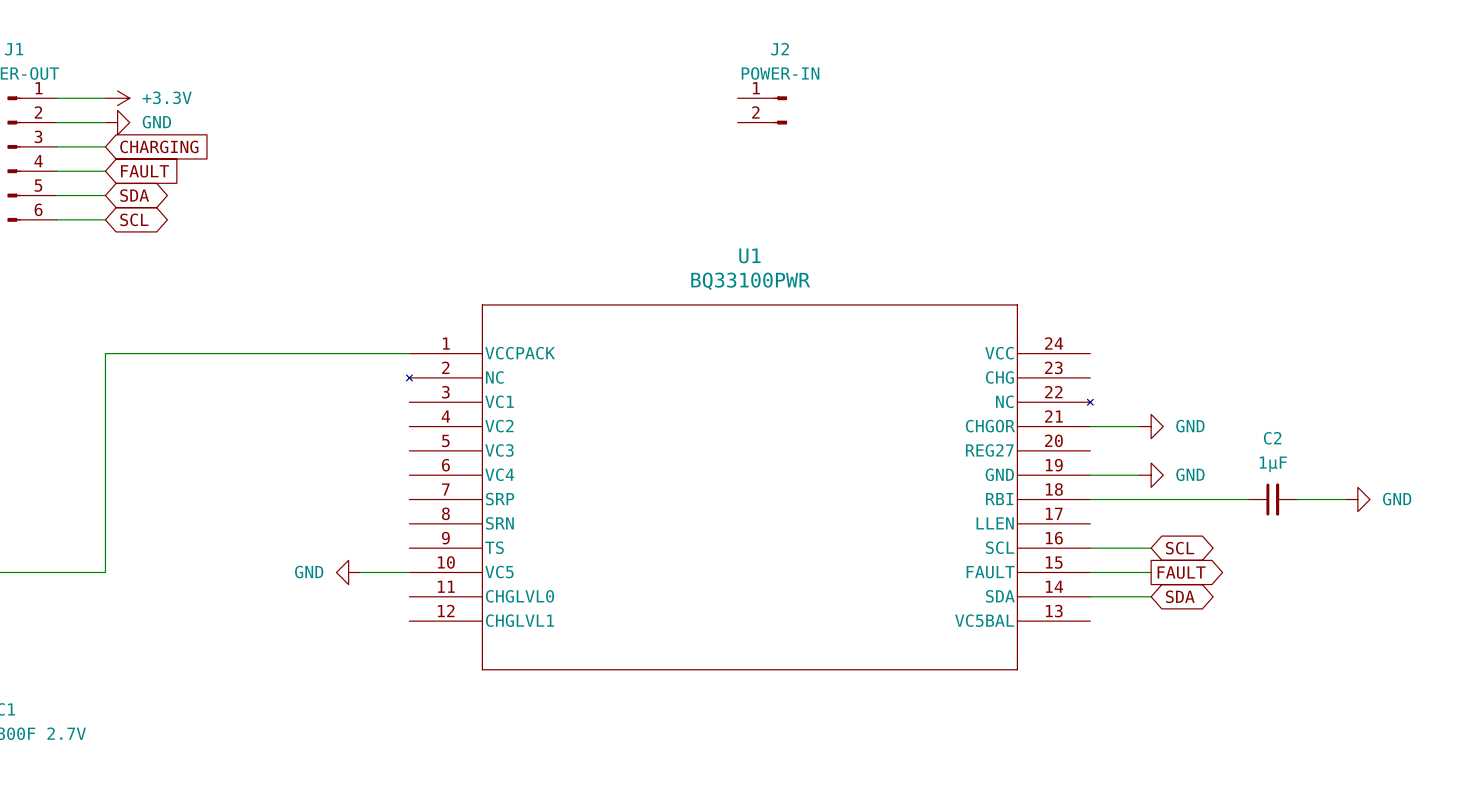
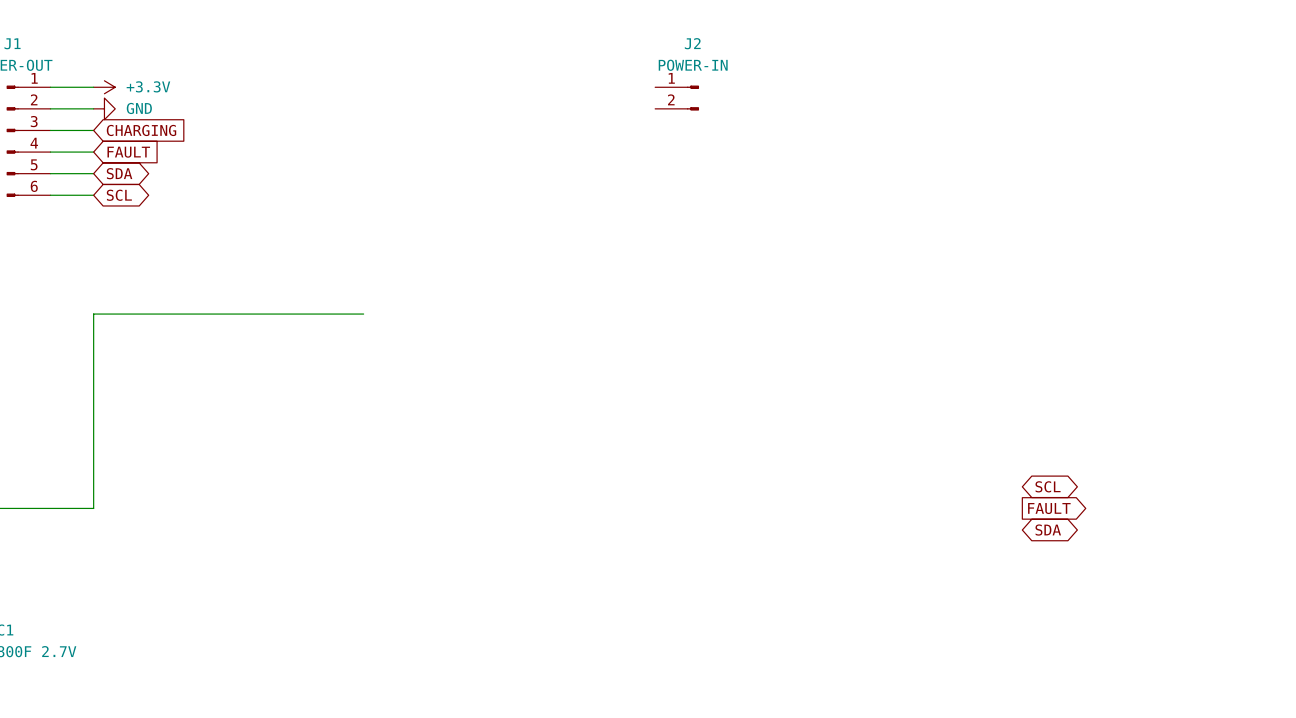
wire: (1090, 426) (1138, 426) -> none
power symbol: GND (1151, 426) -> none
wire: (1090, 475) (1138, 475) -> none
power symbol: GND (1151, 475) -> none
U1: BQ33100PWR (749, 487) -> none
wire: (1090, 499) (1248, 499) -> none
C2: 1µF (1272, 499) -> none
wire: (1297, 499) (1345, 499) -> none
power symbol: GND (1357, 499) -> none
wire: (1090, 548) (1151, 548) -> none
power symbol: GND (348, 572) -> none
wire: (360, 572) (409, 572) -> none
wire: (1090, 572) (1151, 572) -> none
wire: (1090, 596) (1151, 596) -> none

